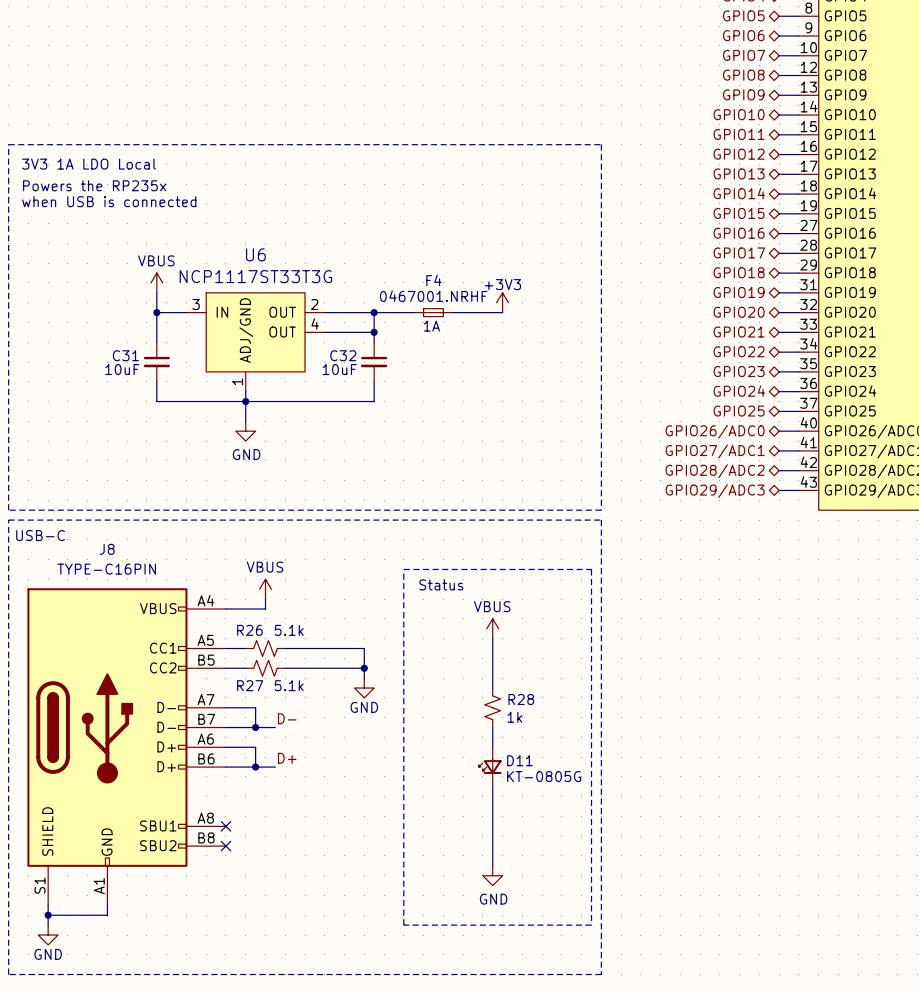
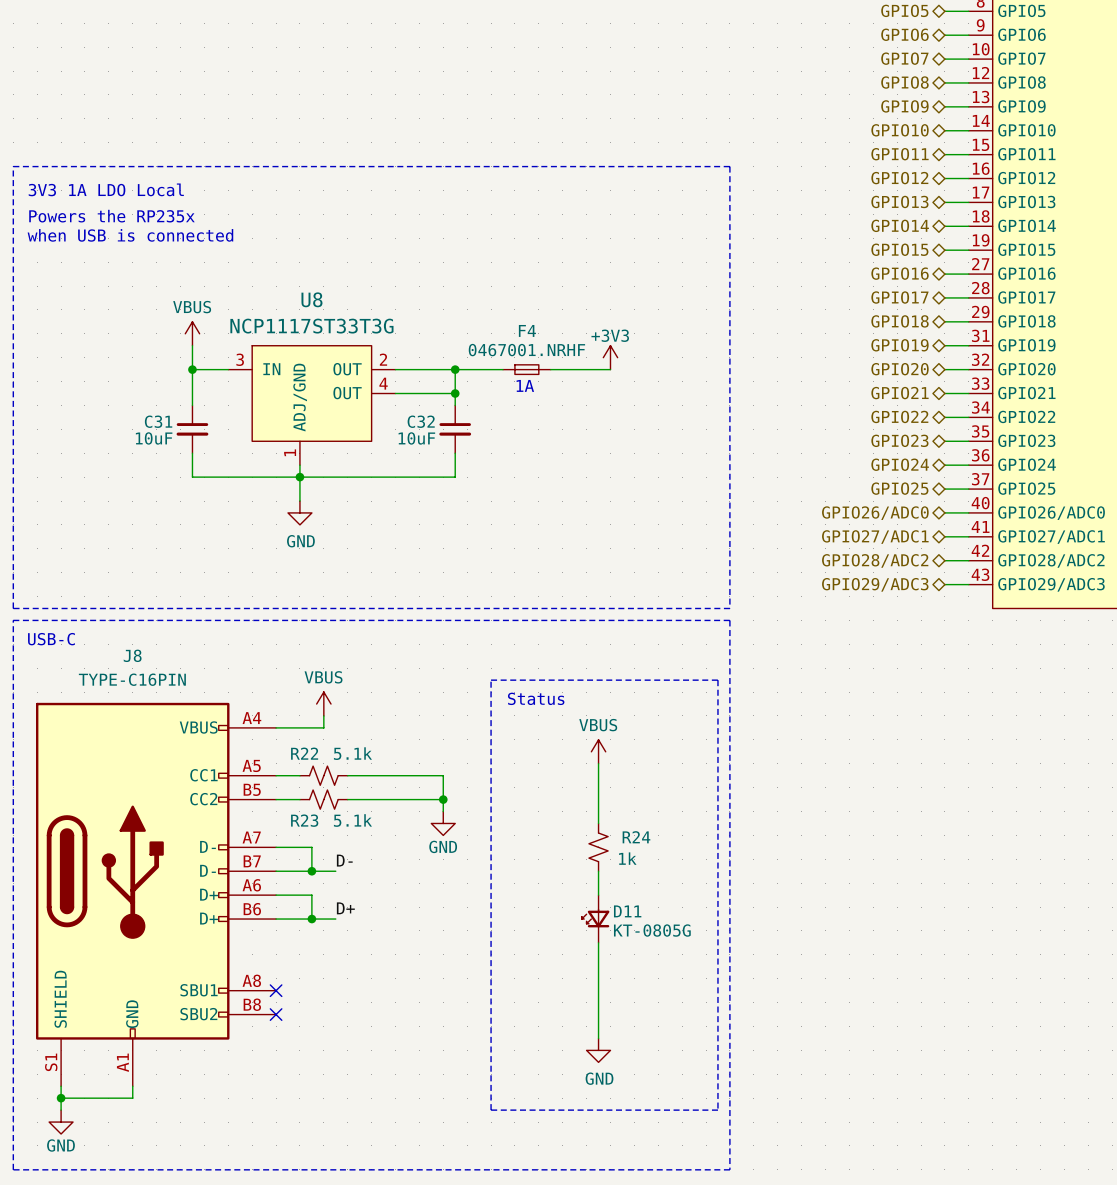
U6 name: U6 (255, 254) -> U8 (311, 299)
R26 name: R26 (249, 630) -> R22 (304, 753)
R27 name: R27 (250, 685) -> R23 (304, 820)
R28 name: R28 (521, 699) -> R24 (636, 837)

